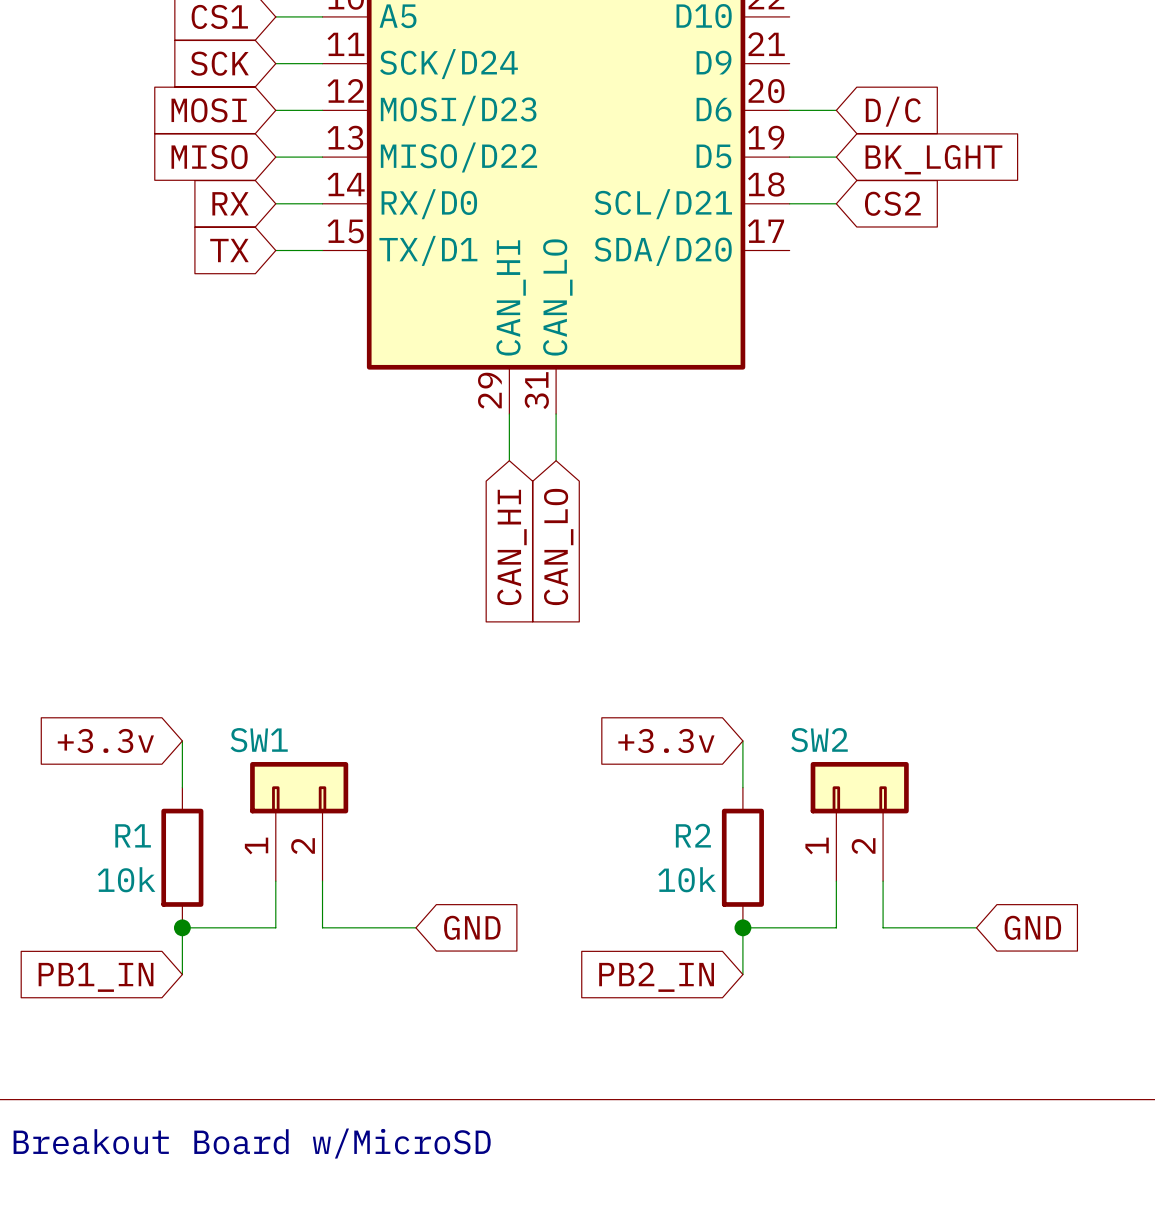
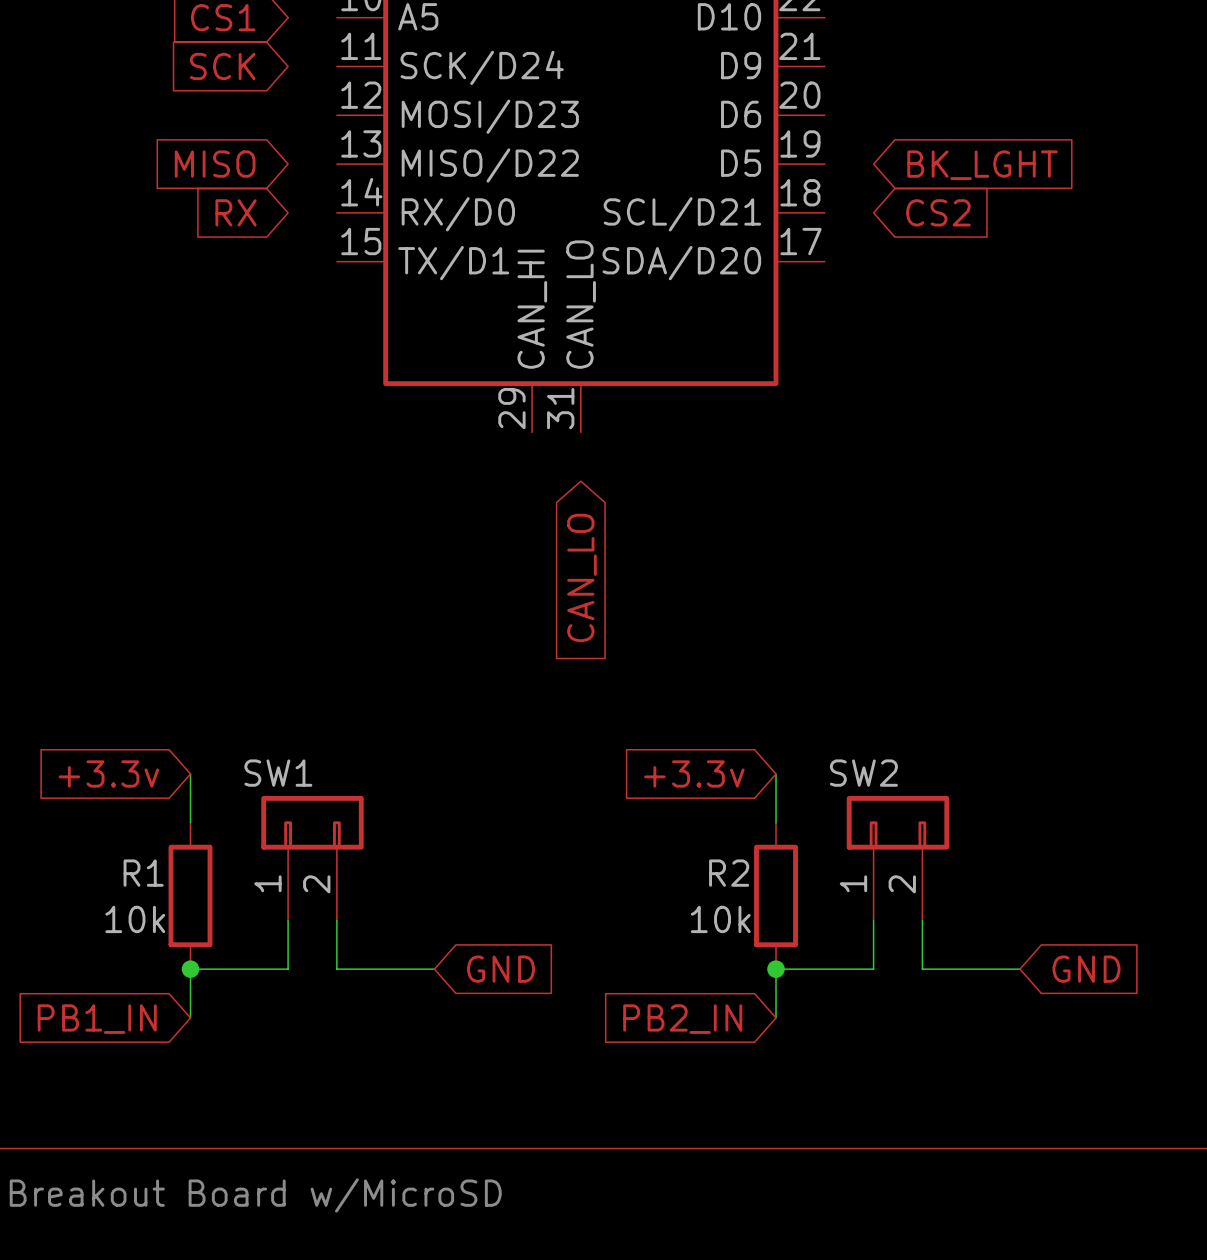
wire: (275, 16) (322, 16) -> none
wire: (275, 63) (322, 63) -> none
global label: MOSI (209, 110) -> none
wire: (275, 110) (322, 110) -> none
wire: (789, 110) (836, 110) -> none
global label: D/C (893, 111) -> none
wire: (275, 157) (322, 157) -> none
wire: (789, 157) (836, 157) -> none
wire: (275, 203) (322, 203) -> none
wire: (789, 203) (836, 203) -> none
global label: TX (229, 250) -> none
wire: (275, 250) (322, 250) -> none
wire: (509, 414) (509, 460) -> none
wire: (556, 414) (556, 460) -> none
global label: CAN_HI (511, 547) -> none

